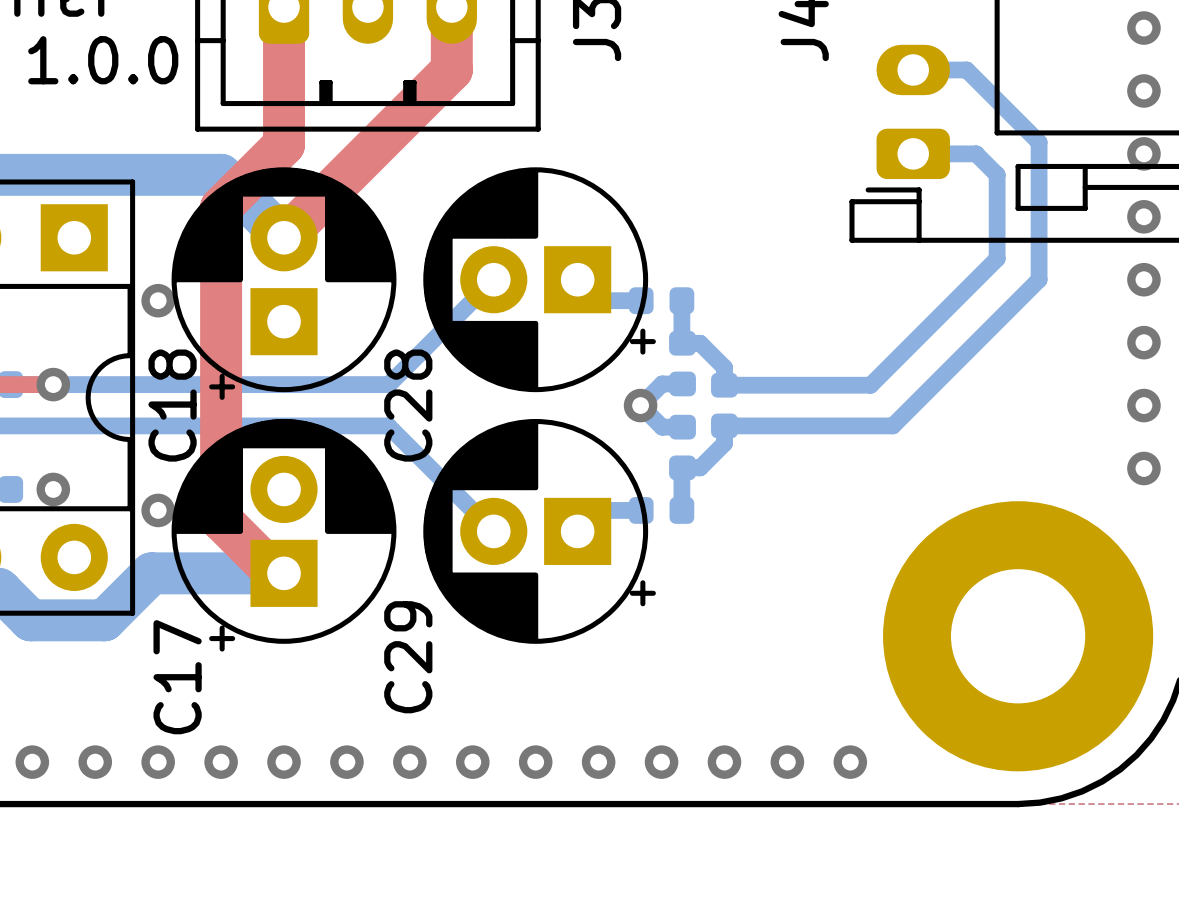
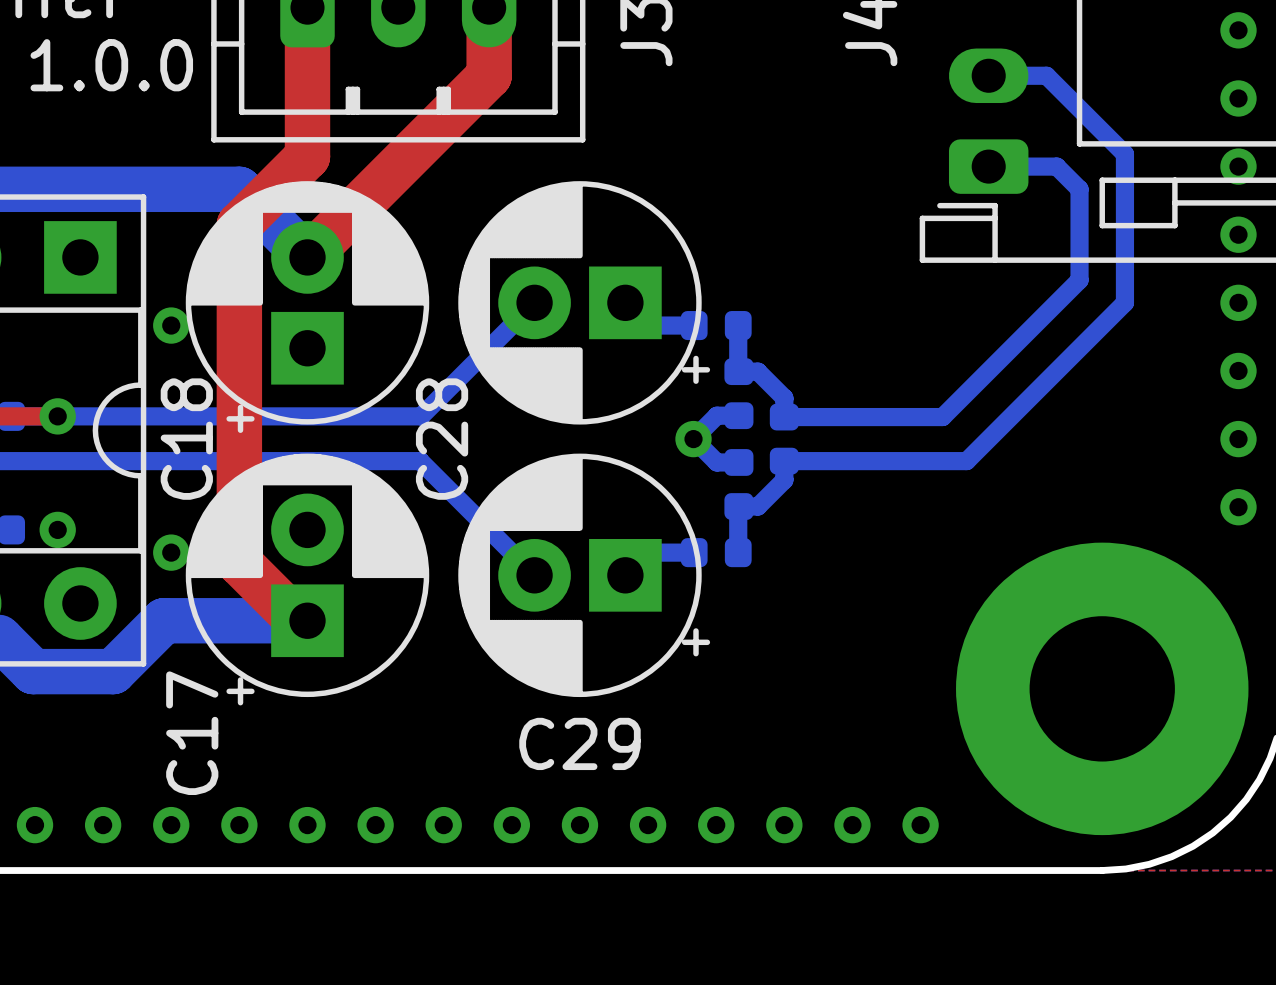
C29 name rotation: 0° (408, 657) -> 90° clockwise (579, 743)

